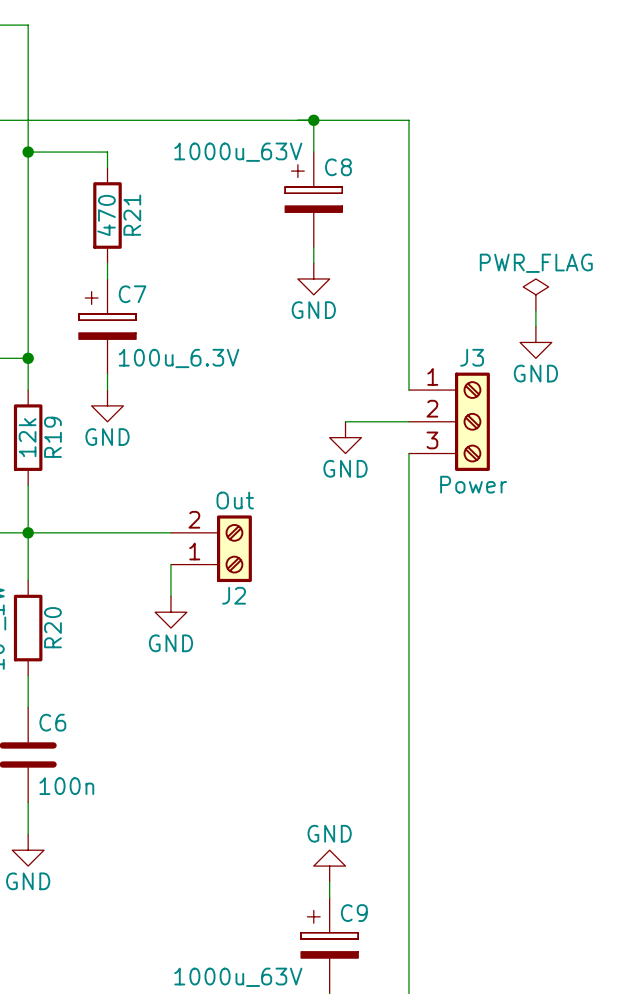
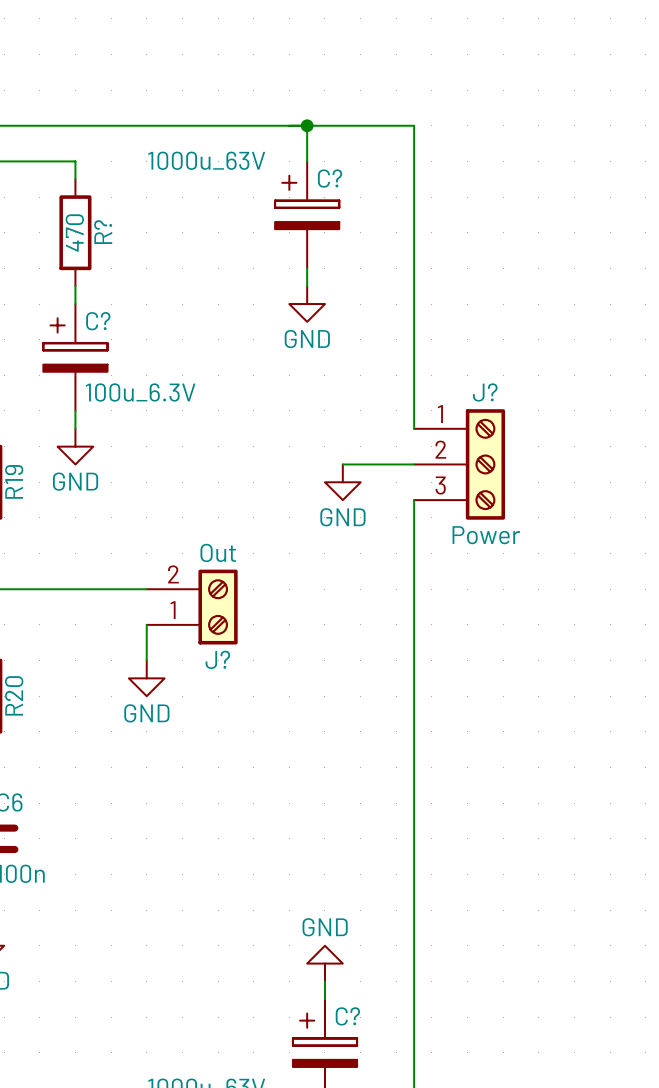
C8 name: C8 (338, 167) -> C? (330, 178)
R21 name: R21 (132, 215) -> R? (103, 232)
C7 name: C7 (132, 294) -> C? (98, 321)
power symbol: PWR_FLAG (535, 294) -> none
wire: (535, 310) (535, 326) -> none
power symbol: GND (535, 342) -> none
J3 name: J3 (472, 357) -> J? (485, 392)
J2 name: J2 (234, 595) -> J? (217, 659)
C9 name: C9 (354, 913) -> C? (347, 1016)

